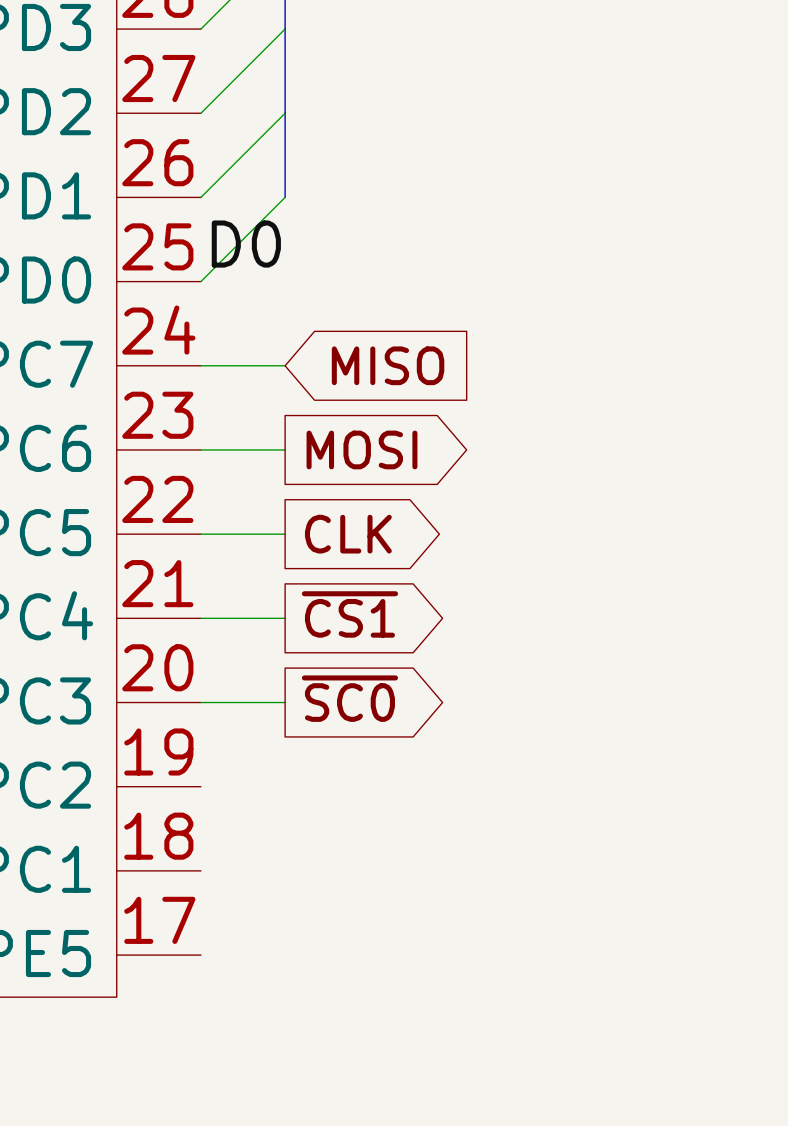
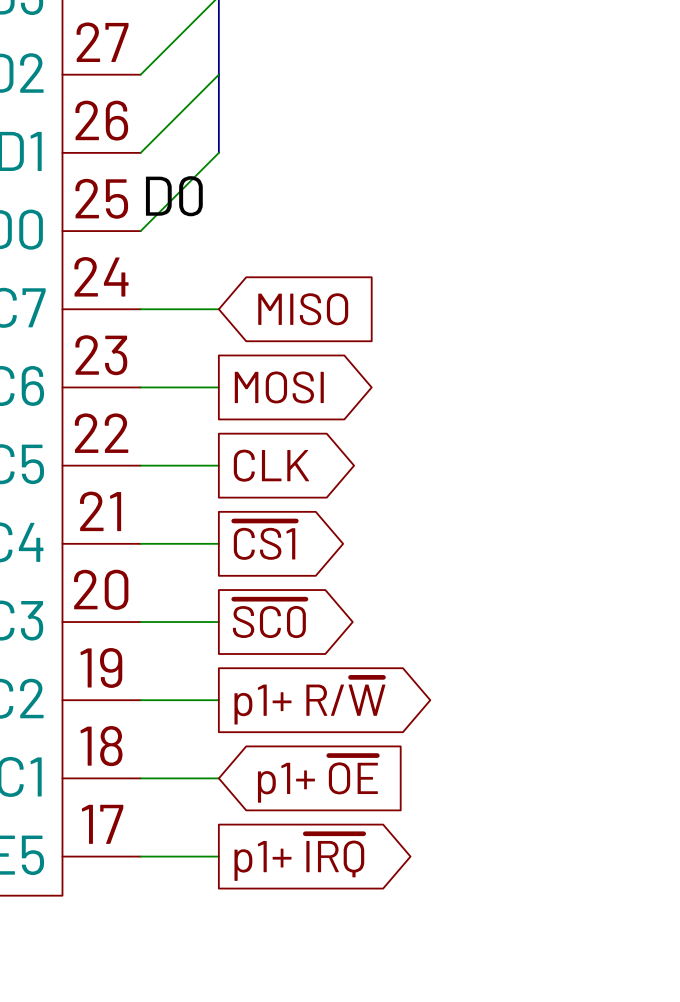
wire: none -> (140, 700) (218, 700)
global label: none -> p1+ R/~{W} (309, 700)
wire: none -> (140, 778) (218, 778)
global label: none -> p1+ ~{OE} (317, 779)
wire: none -> (140, 856) (218, 856)
global label: none -> p1+ ~{IRQ} (299, 857)

